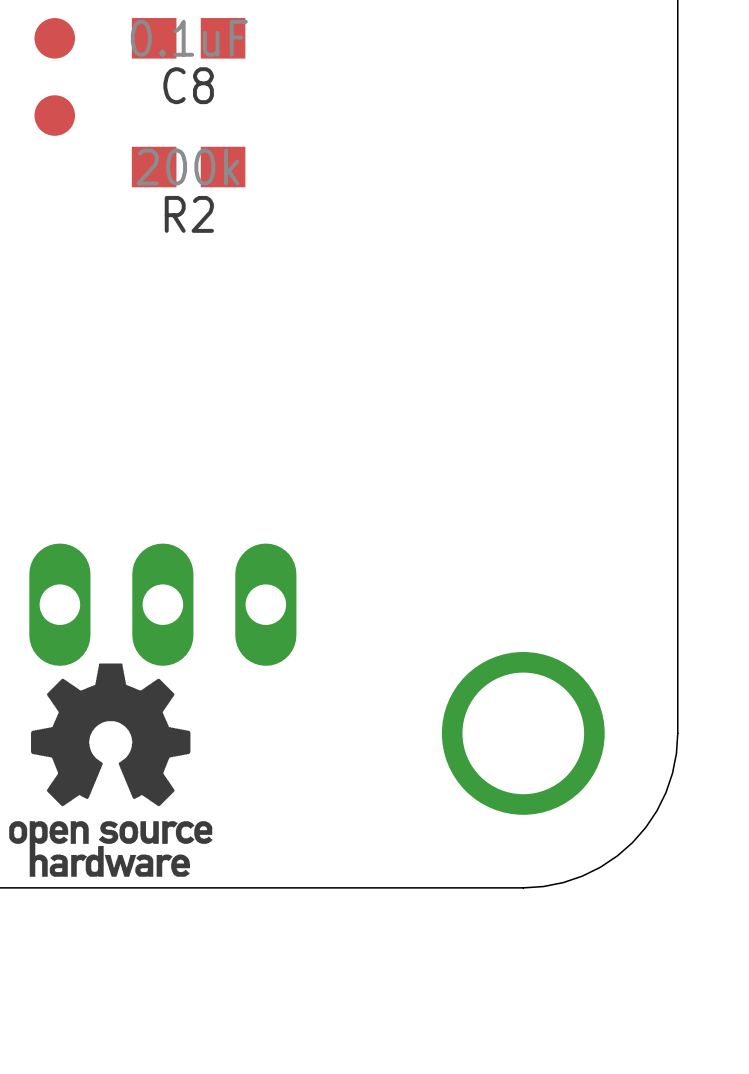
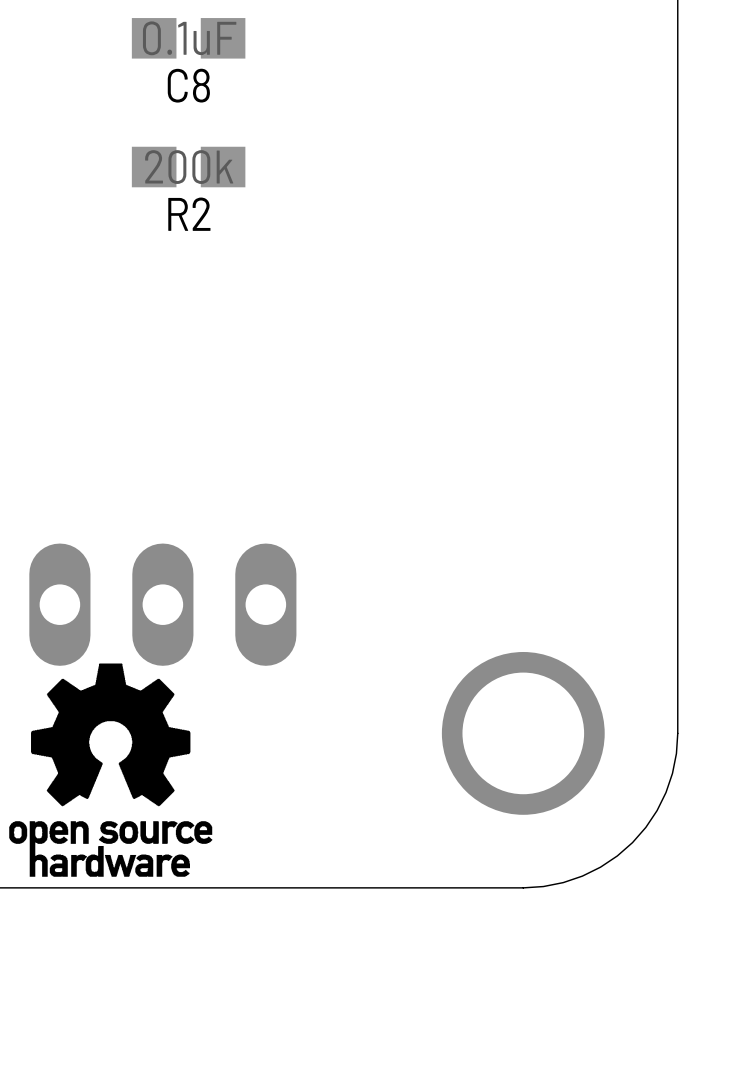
part: (54, 38) -> none
part: (54, 115) -> none

